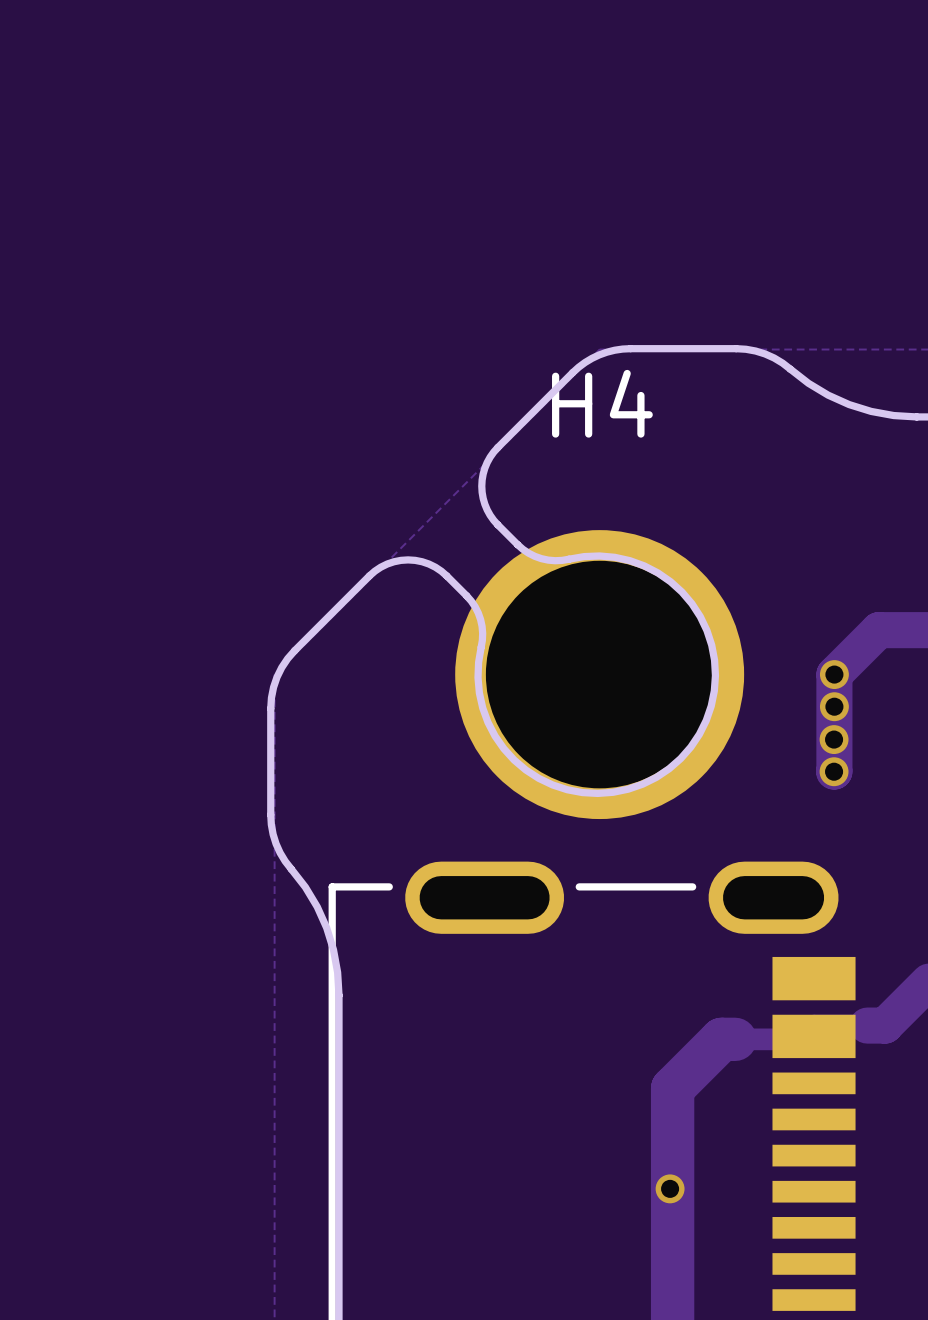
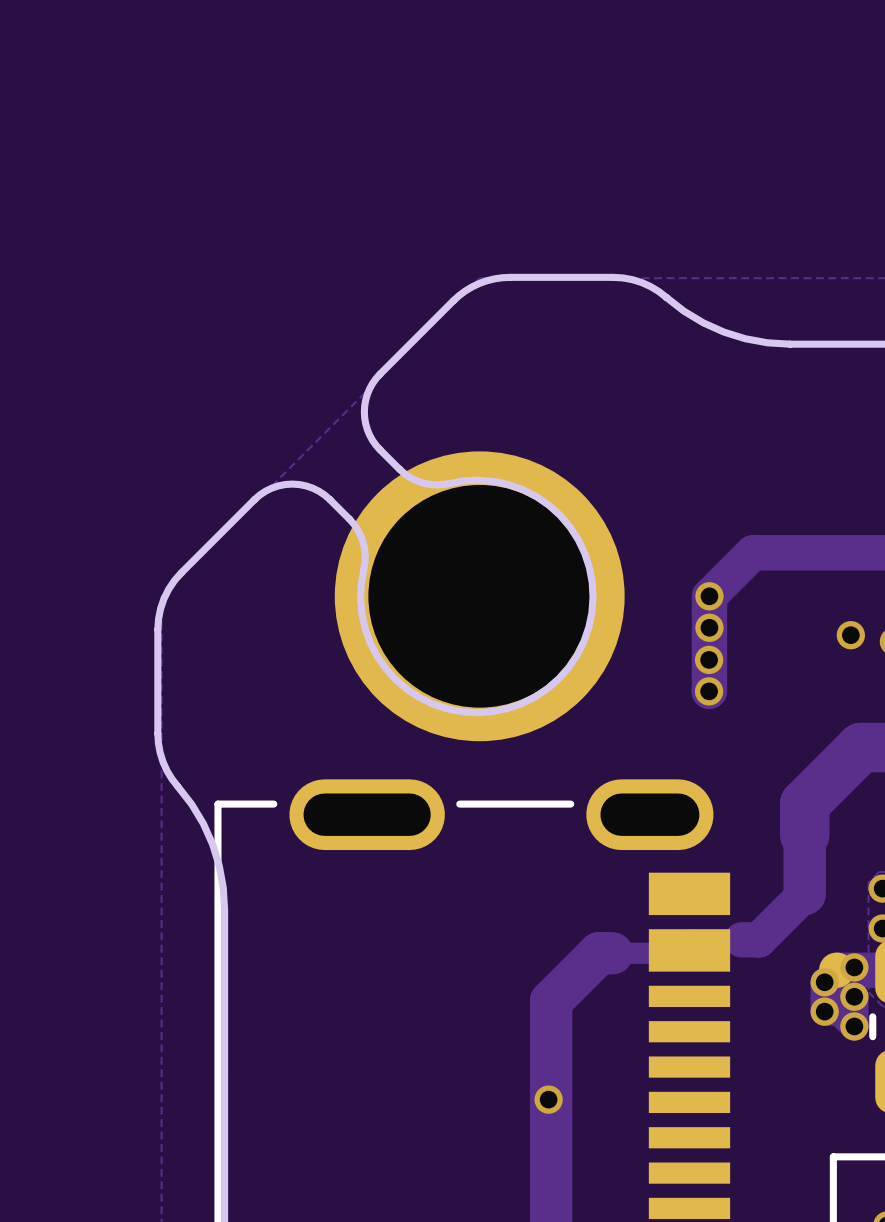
H4: (599, 674) -> none
part: none -> (479, 596)

